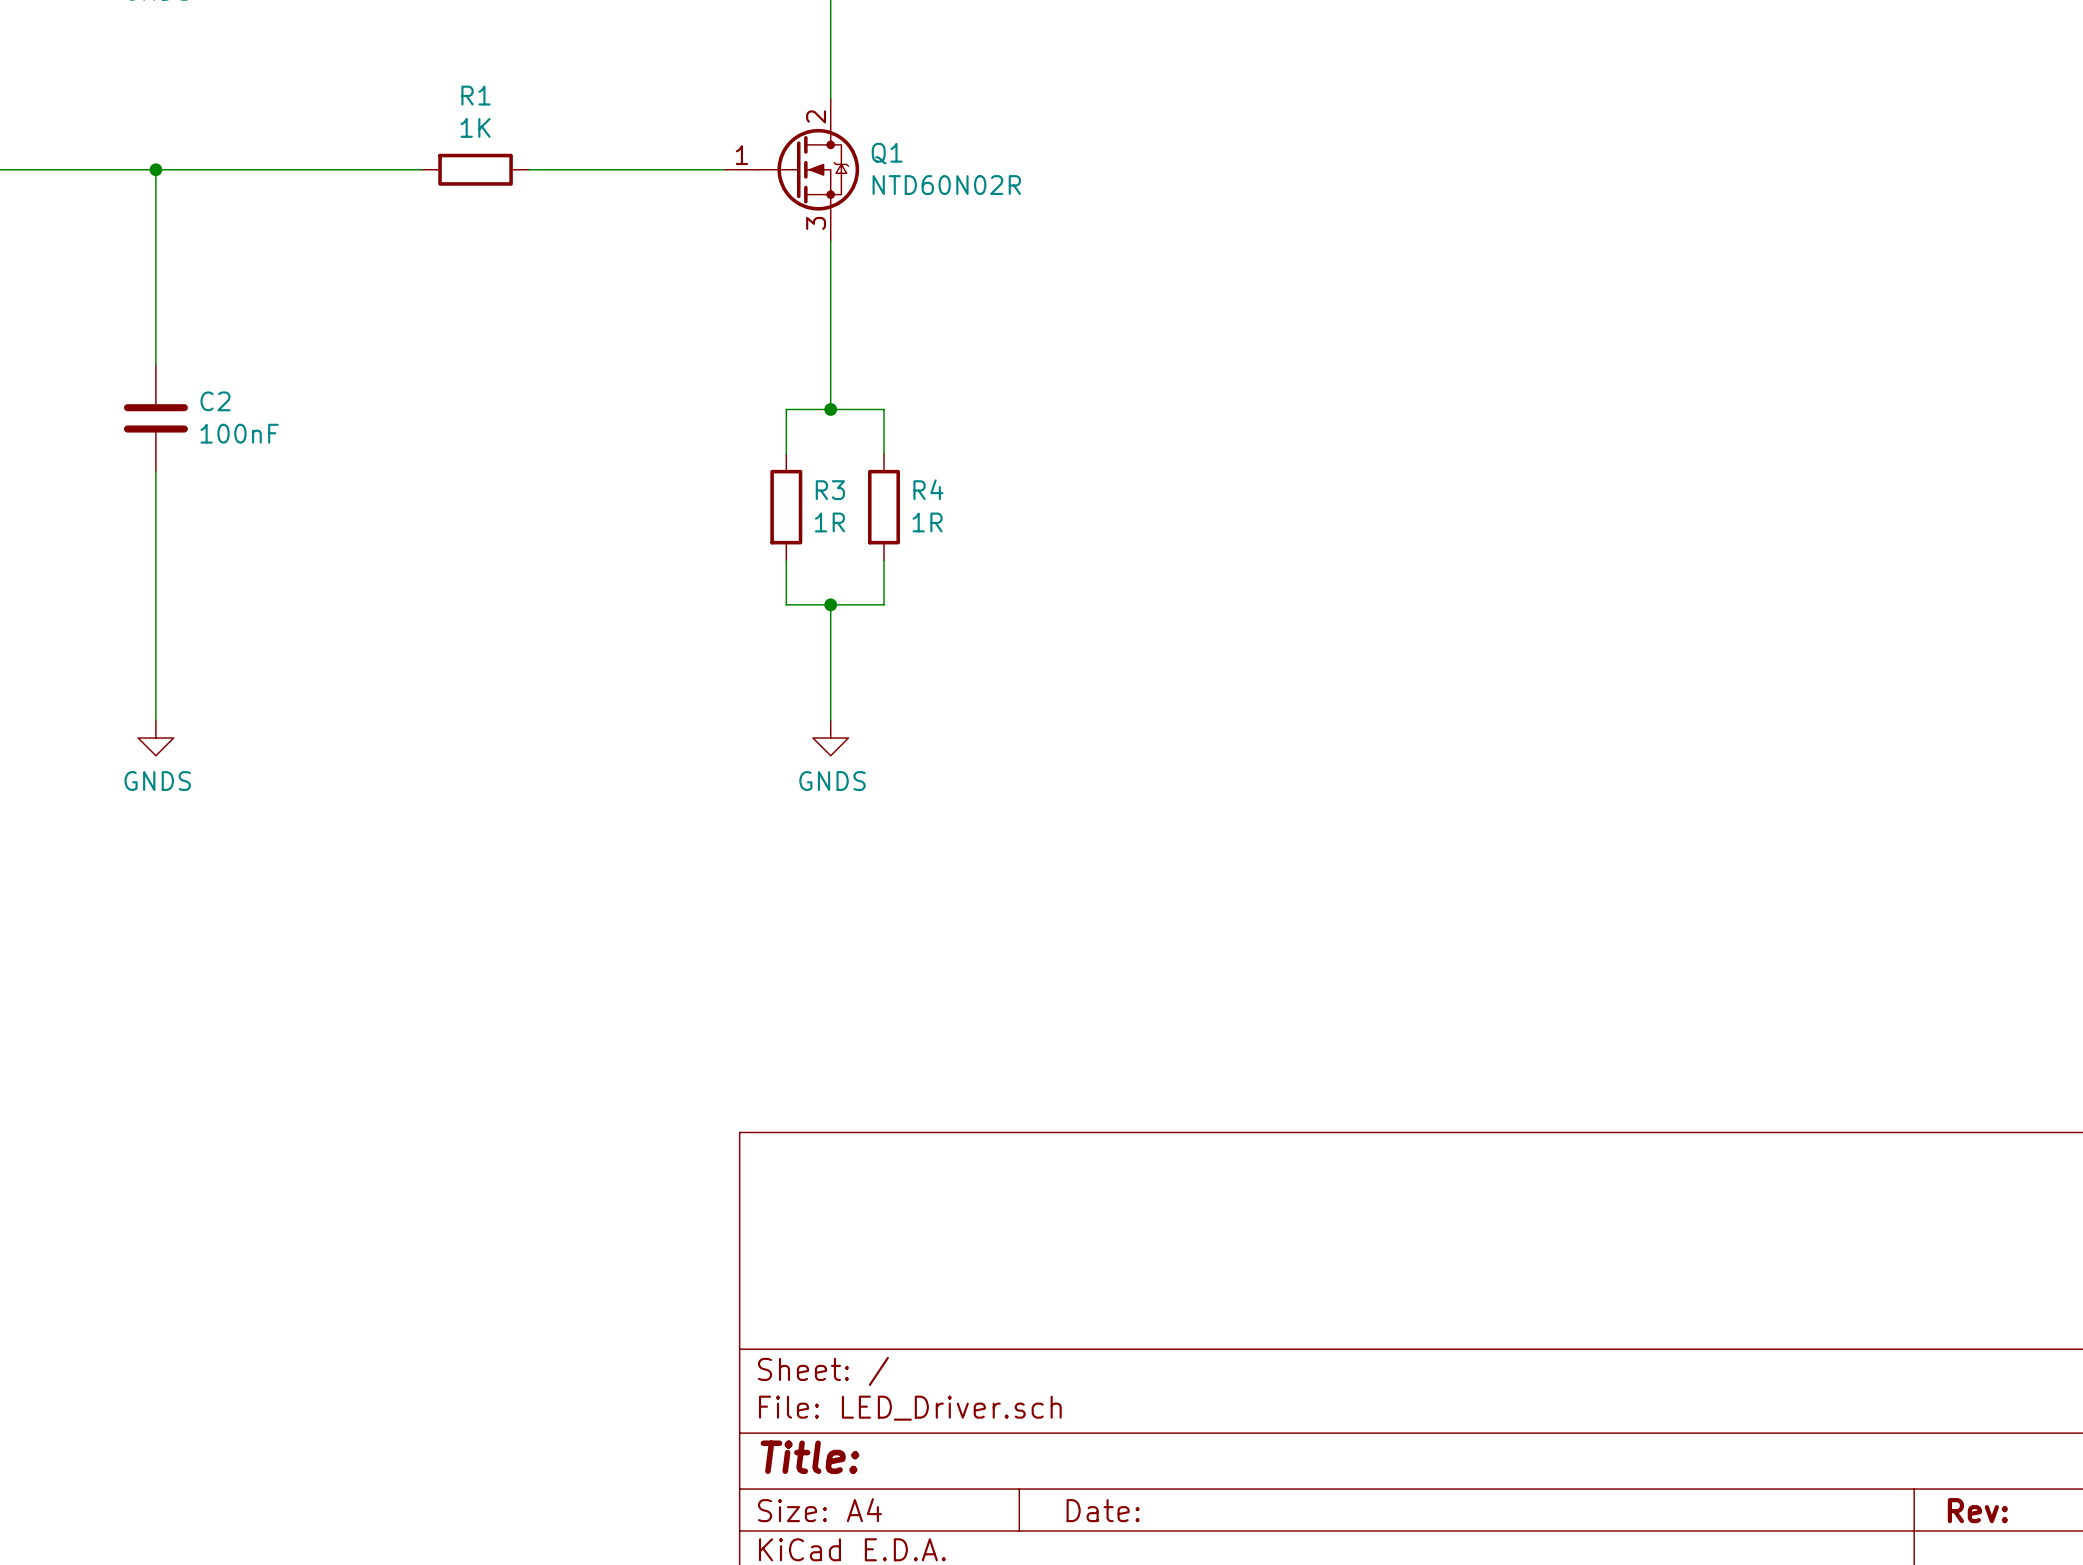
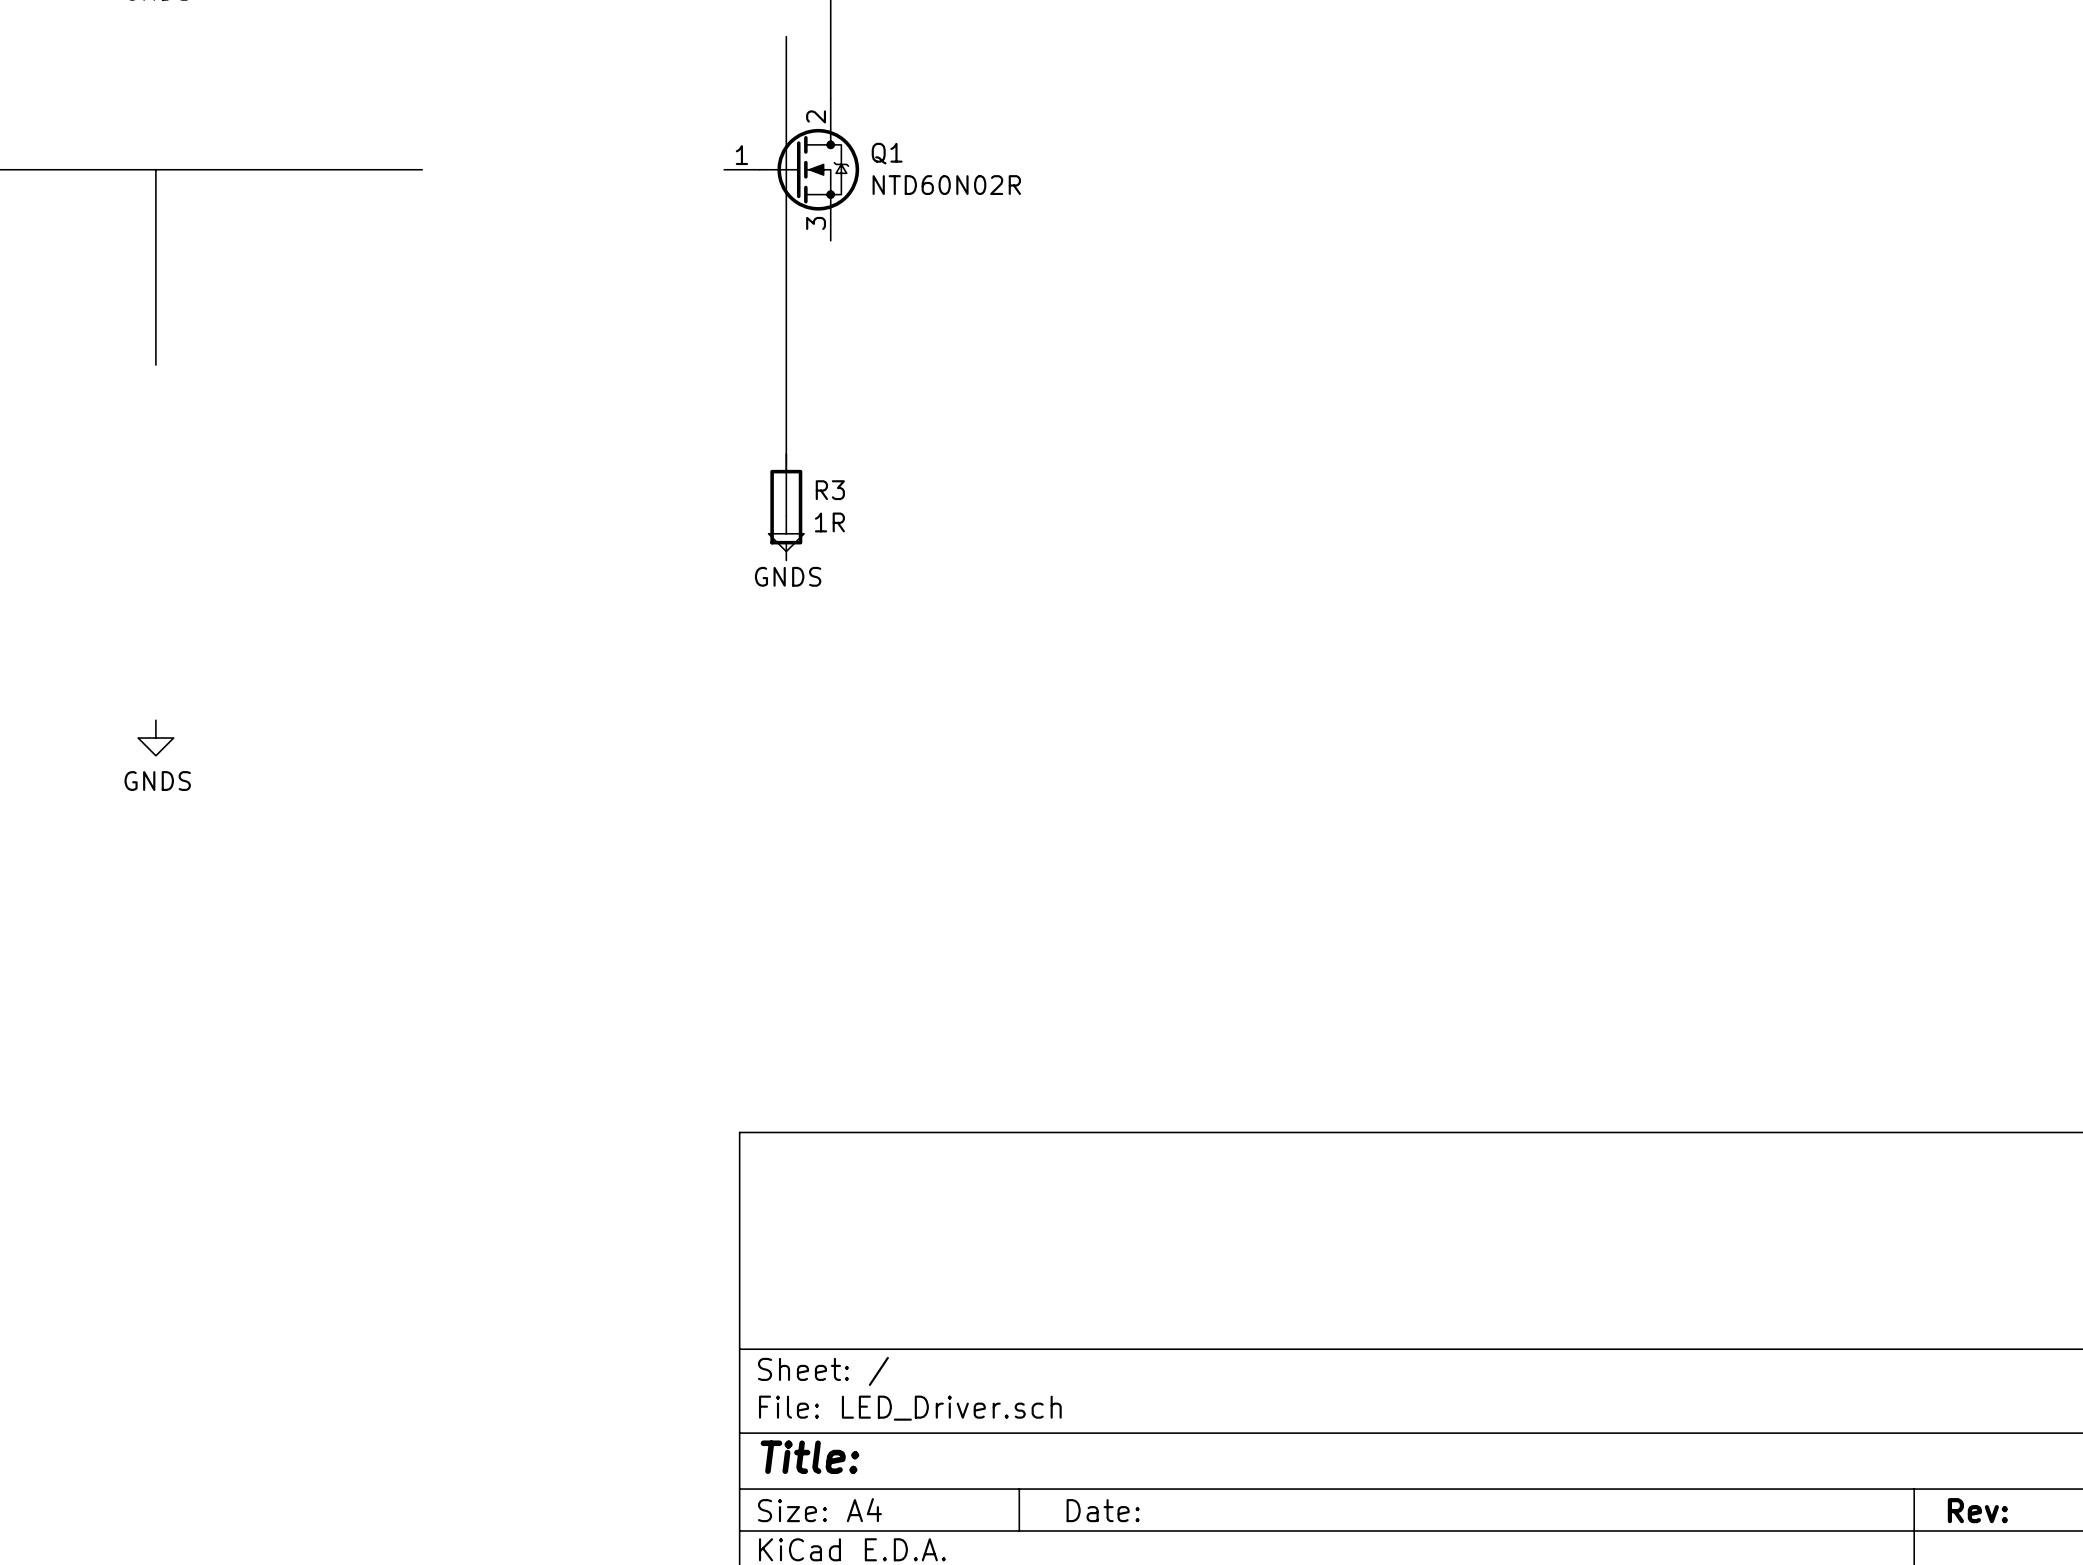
junction: (155, 169) -> none
R1: 1K (475, 169) -> none
wire: (528, 169) (724, 169) -> none
wire: (830, 240) (830, 409) -> none
wire: (786, 409) (883, 409) (883, 453) -> (786, 409) (786, 36)
junction: (830, 409) -> none
C2: 100nF (155, 418) -> none
wire: none -> (786, 453) (786, 516)
wire: (155, 471) (155, 720) -> none
R4: 1R (883, 507) -> none
wire: (786, 560) (786, 604) (883, 604) (883, 560) -> none
wire: (830, 604) (830, 720) -> none
junction: (830, 604) -> none
power symbol position: GNDS (830, 738) -> GNDS (786, 533)

